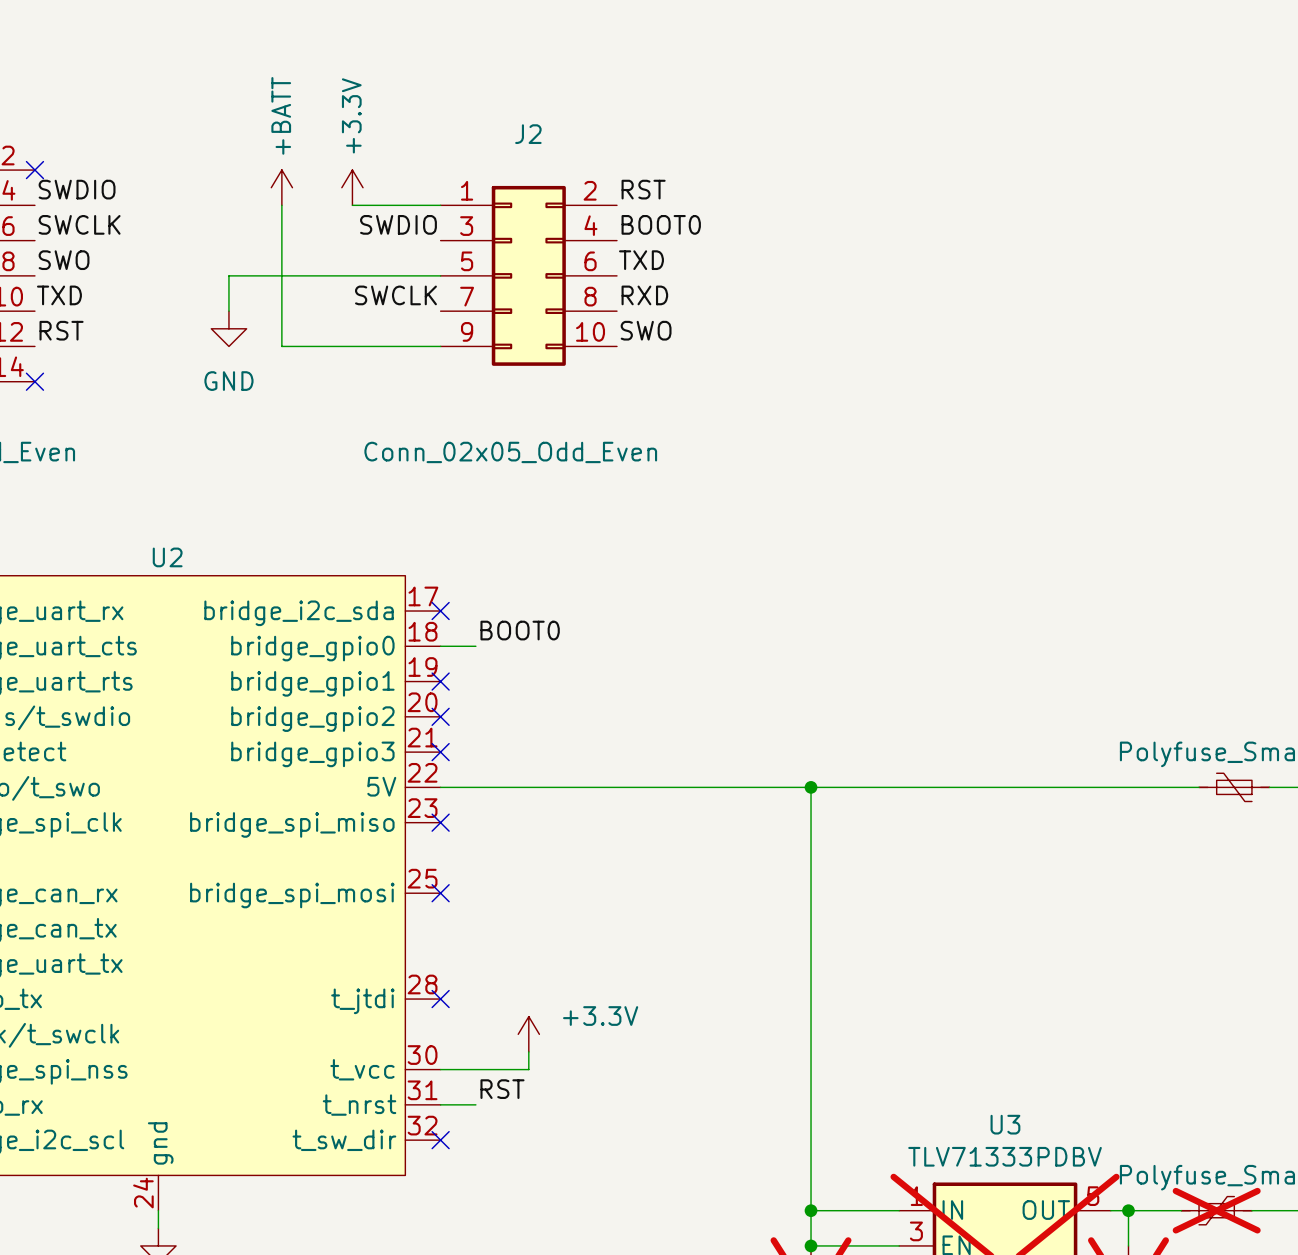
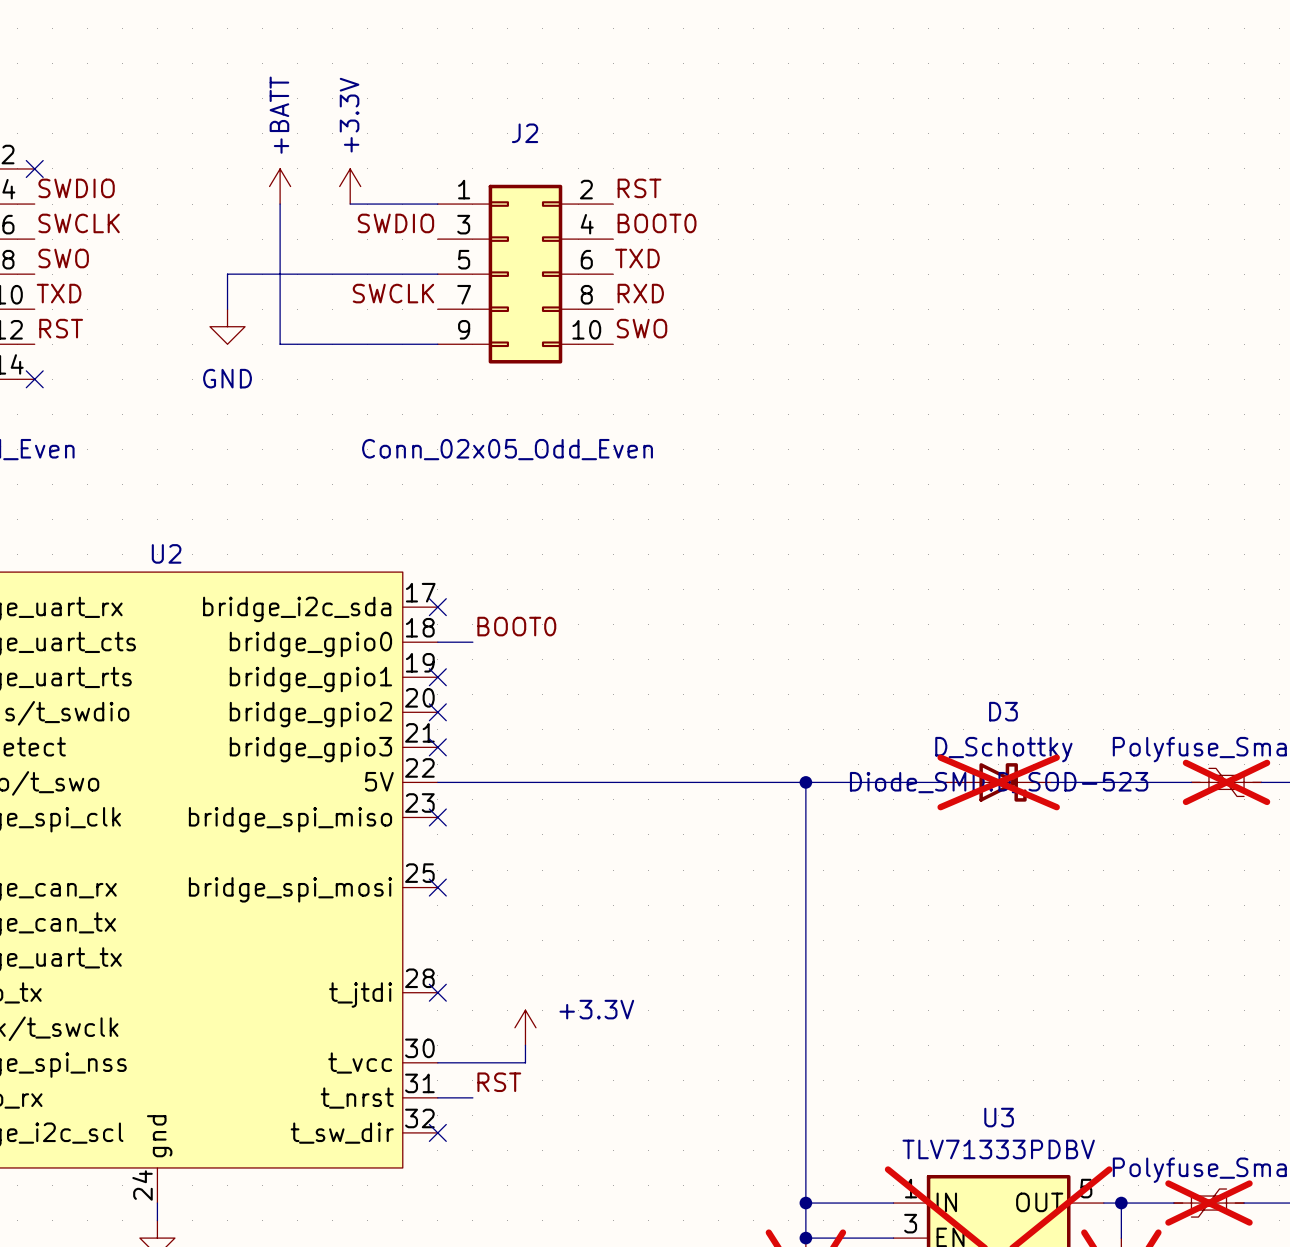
D3: none -> D_Schottky (998, 782)
part do-not-place cross: none -> (1226, 782)

